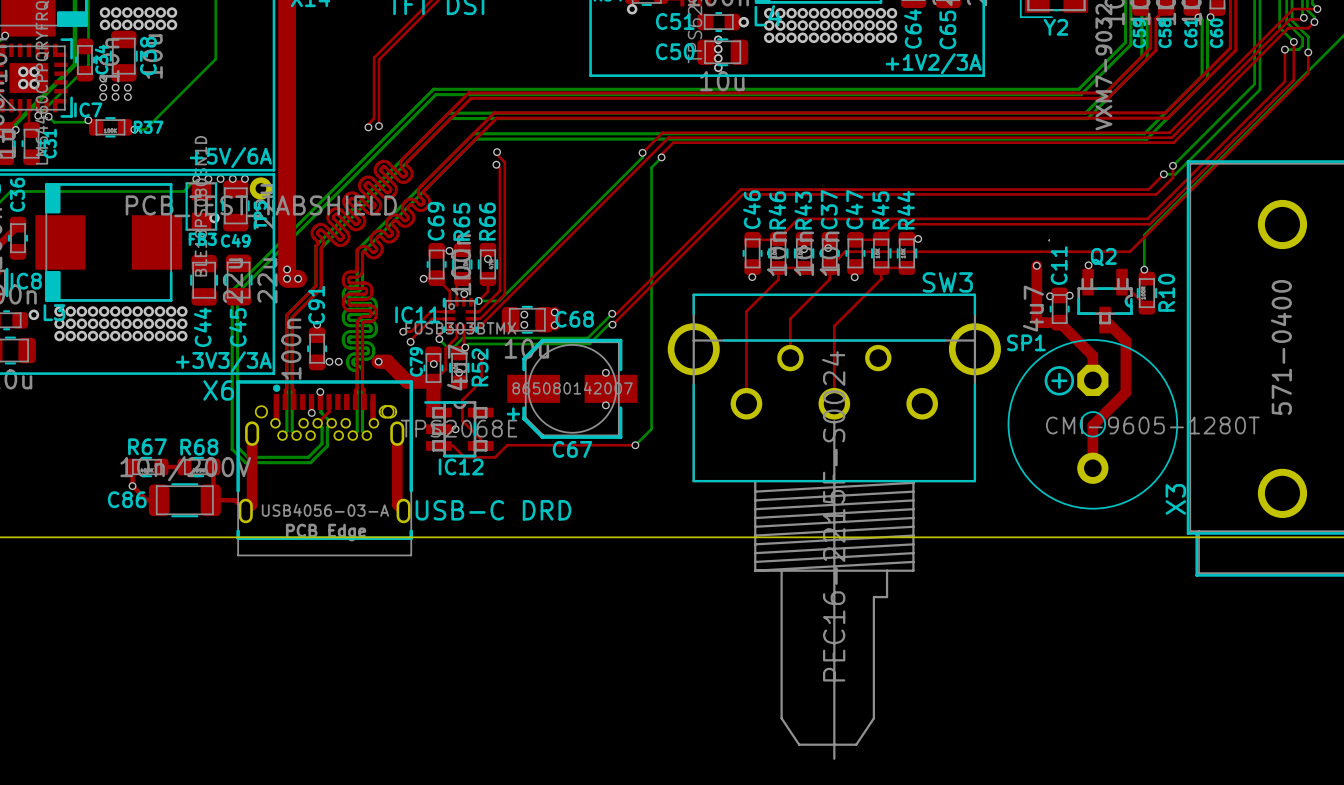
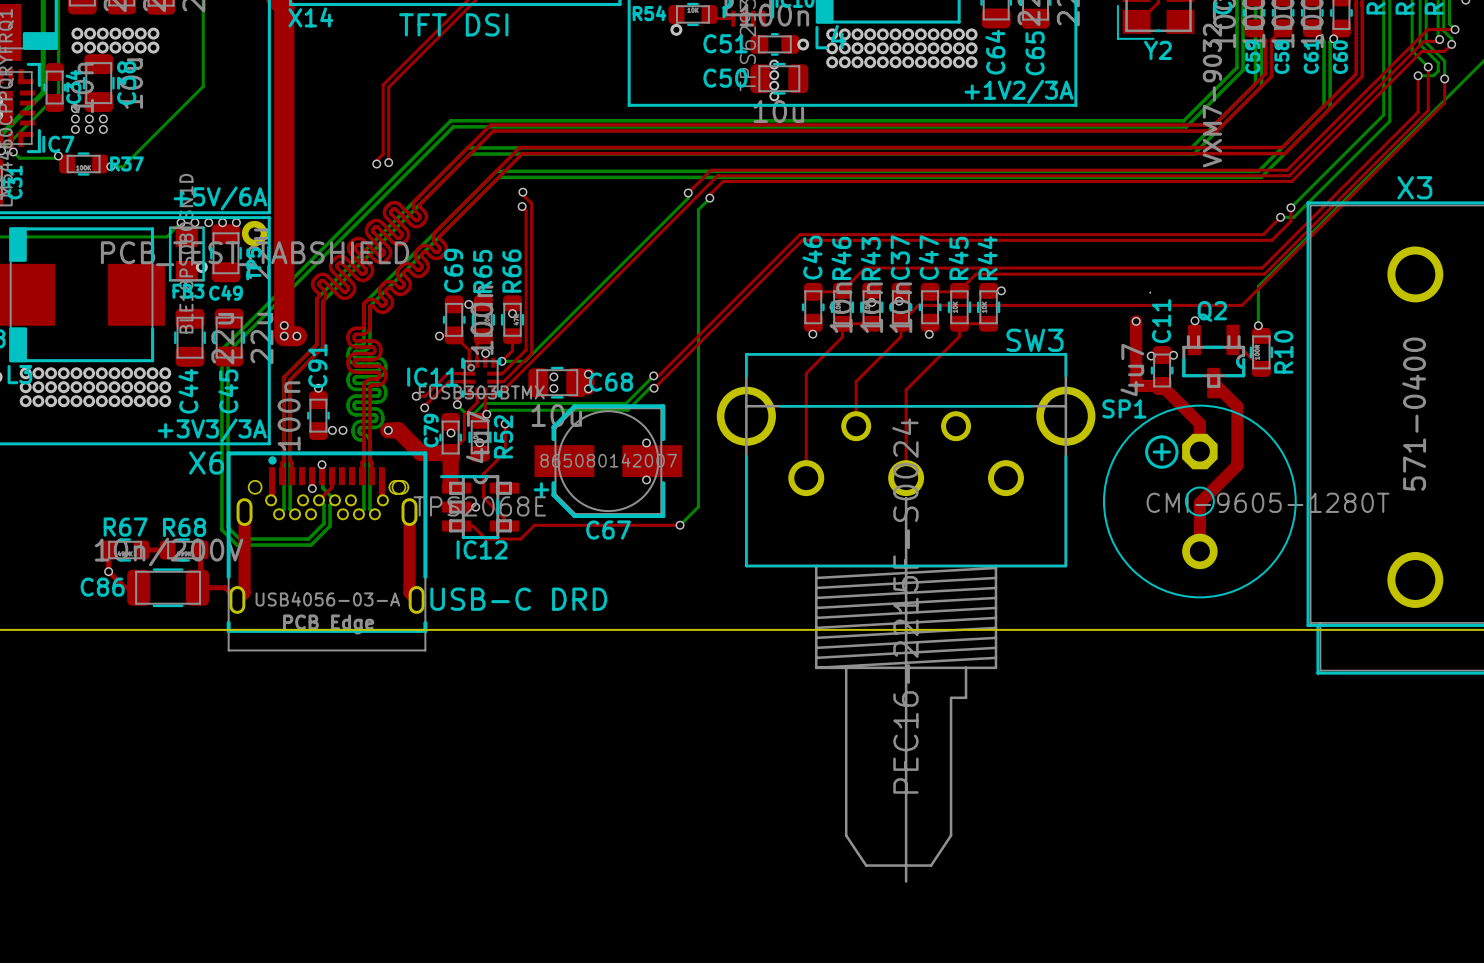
X3 name rotation: 0° (1175, 499) -> 90° clockwise (1414, 187)
X3 name position: X3 (1175, 499) -> X3 (1414, 187)

